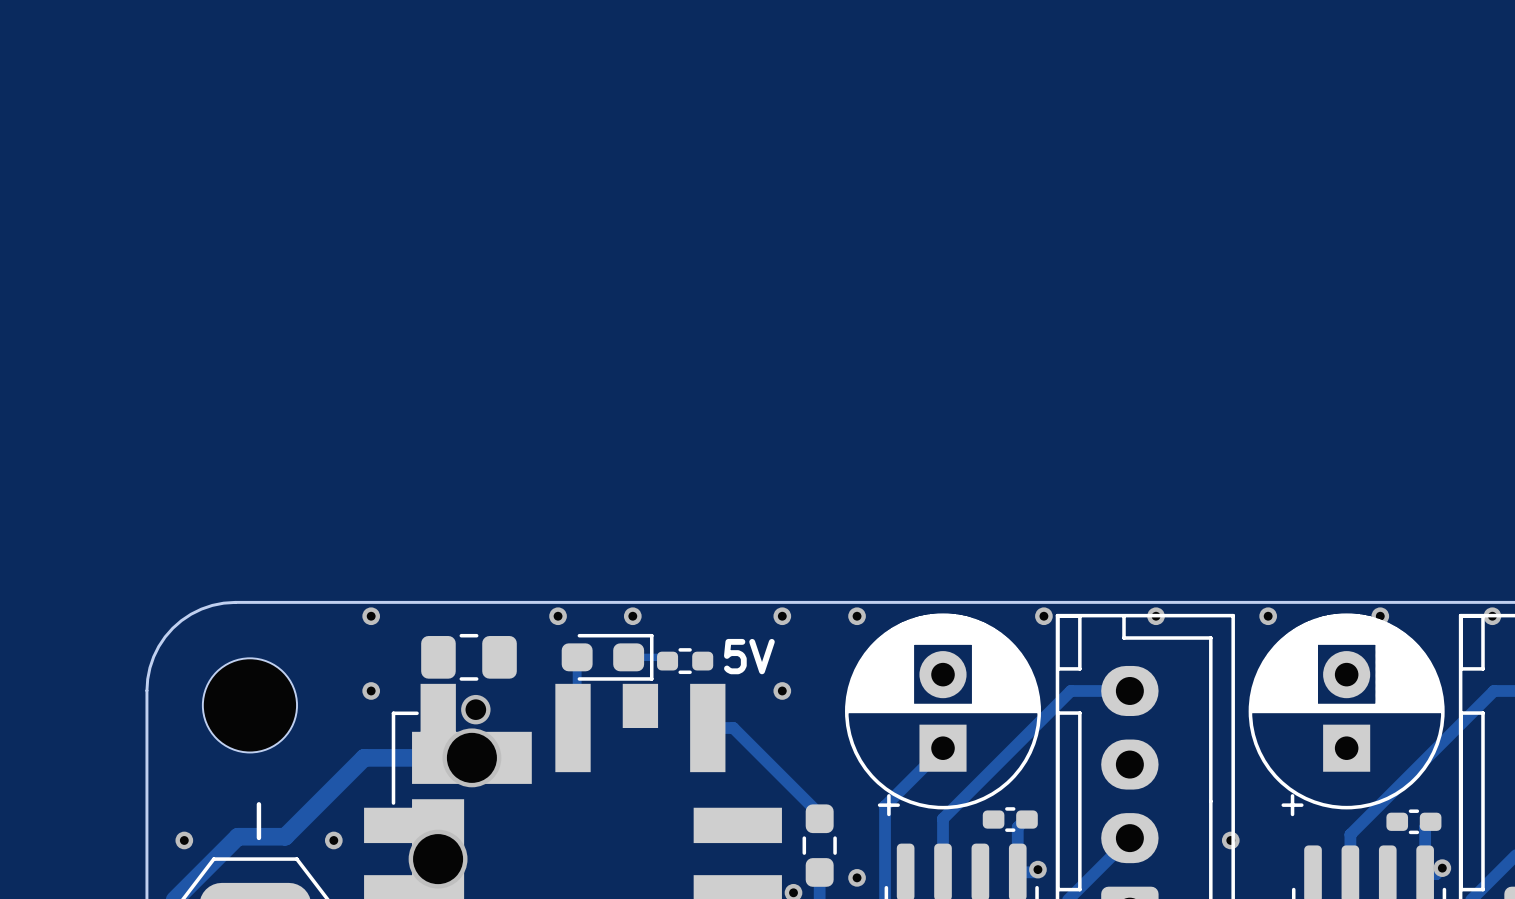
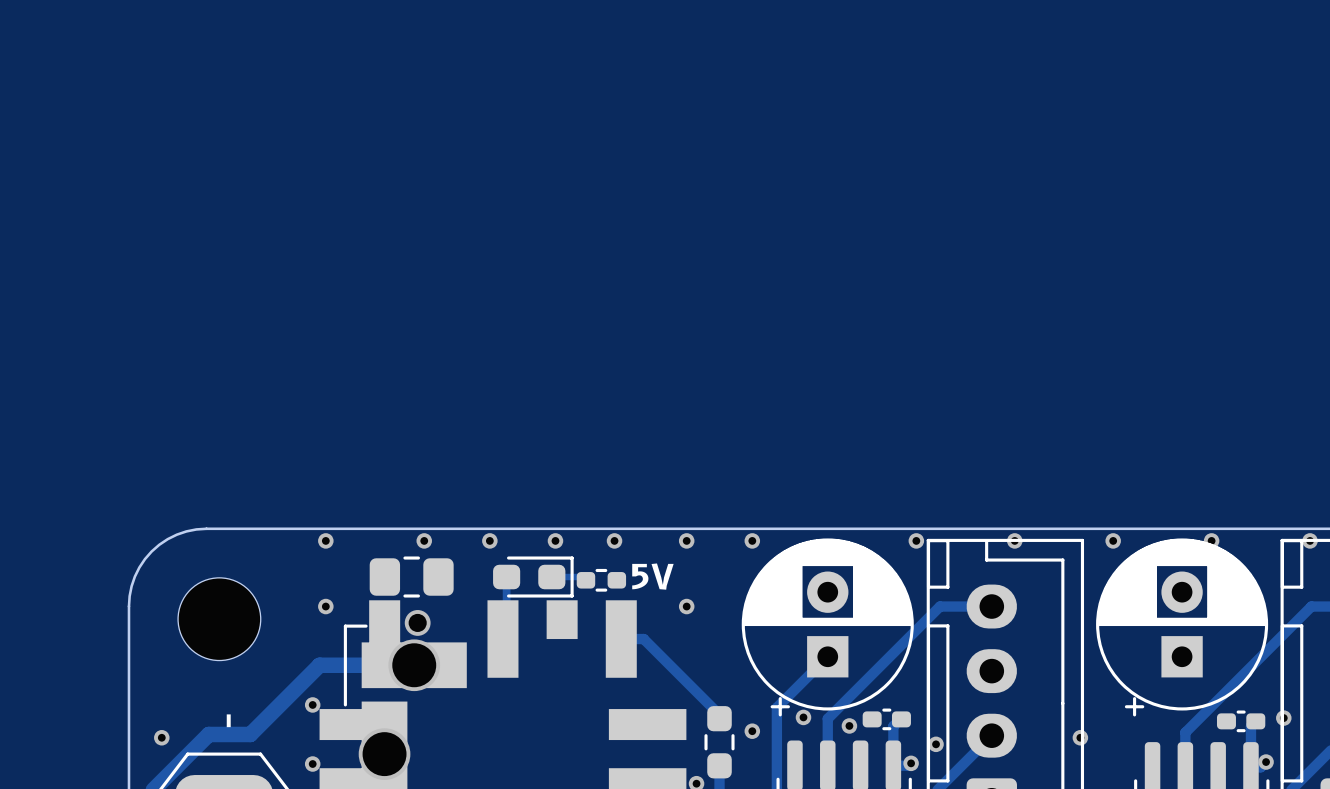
via: none -> (424, 540)
via: none -> (614, 540)
via: none -> (312, 704)
via: none -> (803, 717)
via: none -> (1283, 718)
via: none -> (849, 725)
via: none -> (752, 731)
via: (333, 840) -> none
via: none -> (936, 744)
via: none -> (312, 764)
via: (857, 877) -> none

